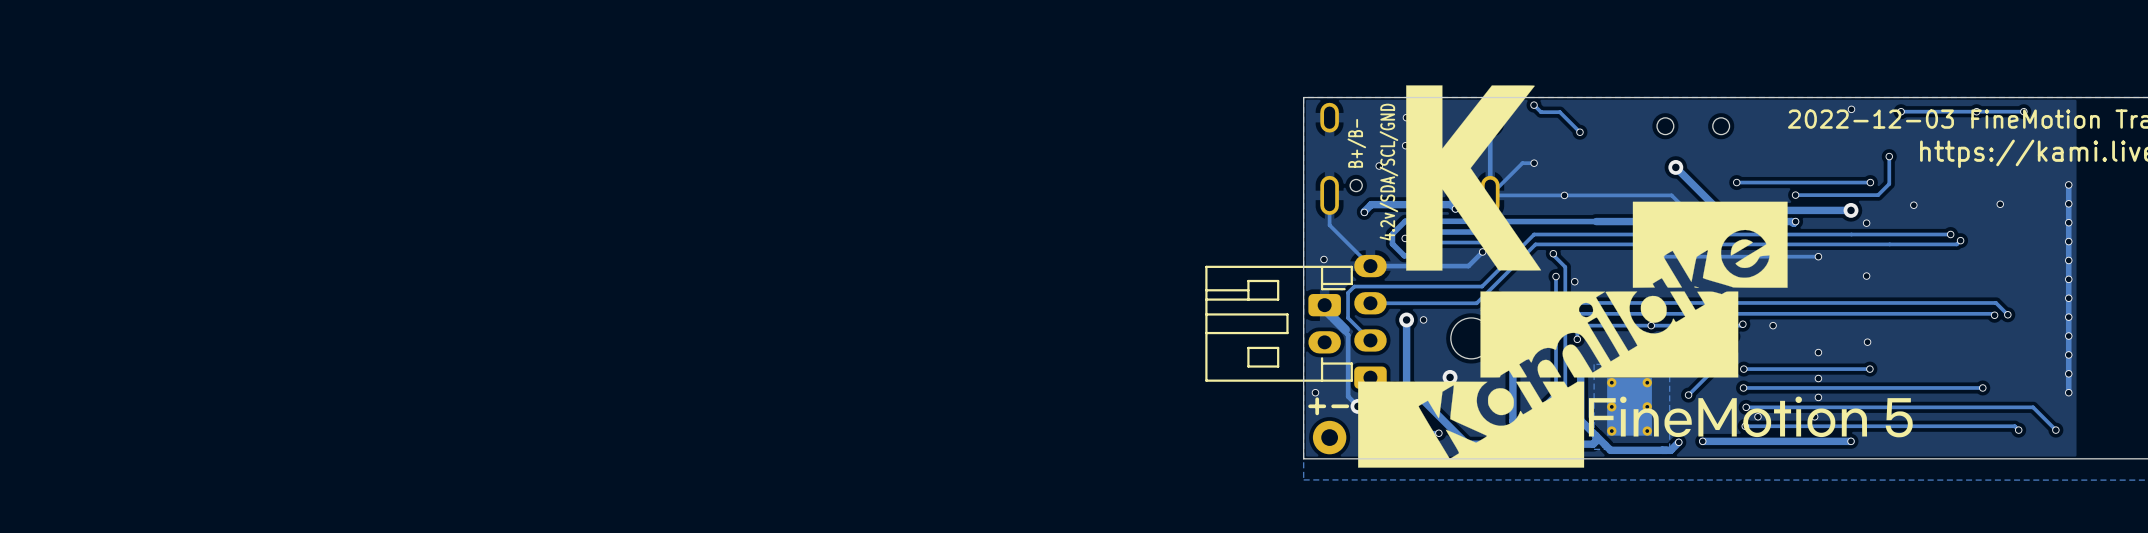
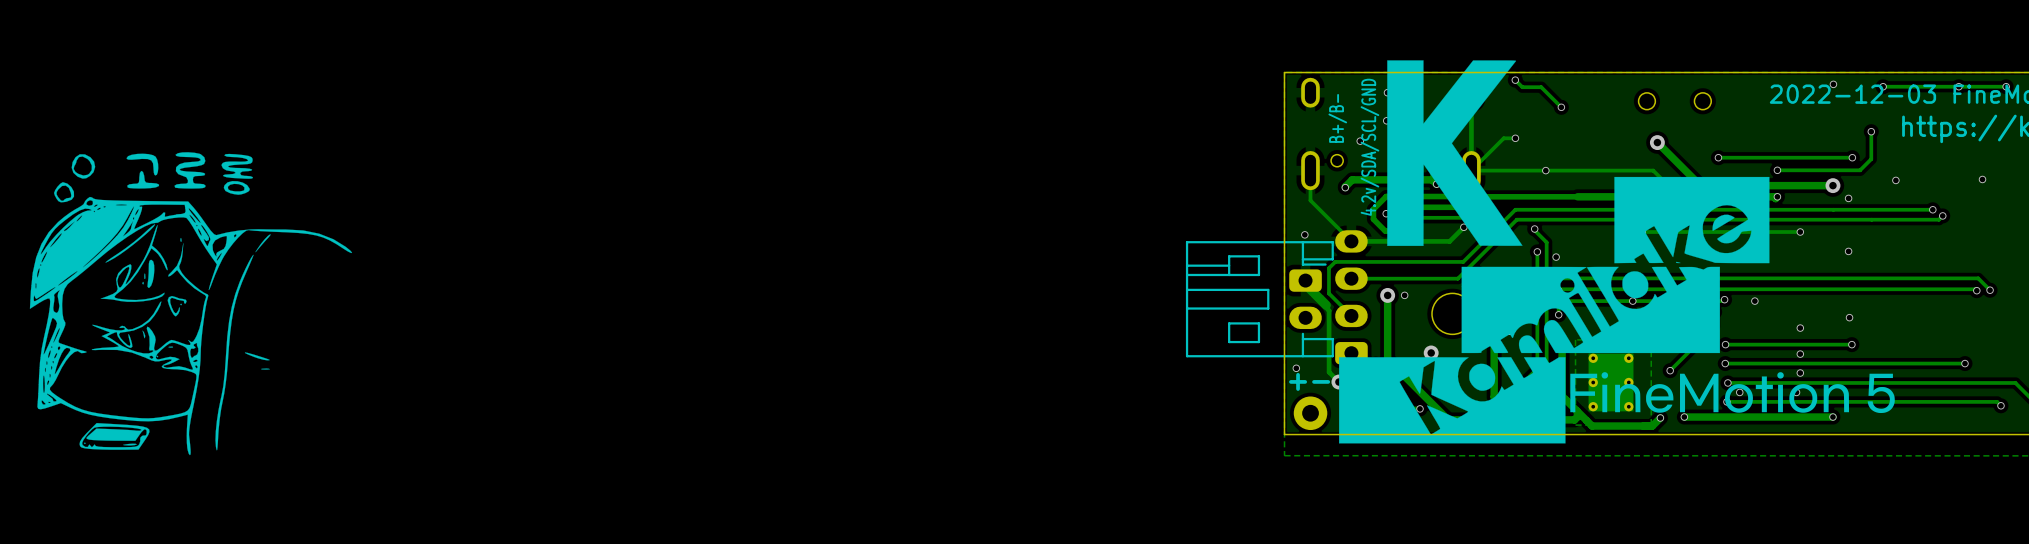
drawing: none -> [29, 152, 353, 456]

